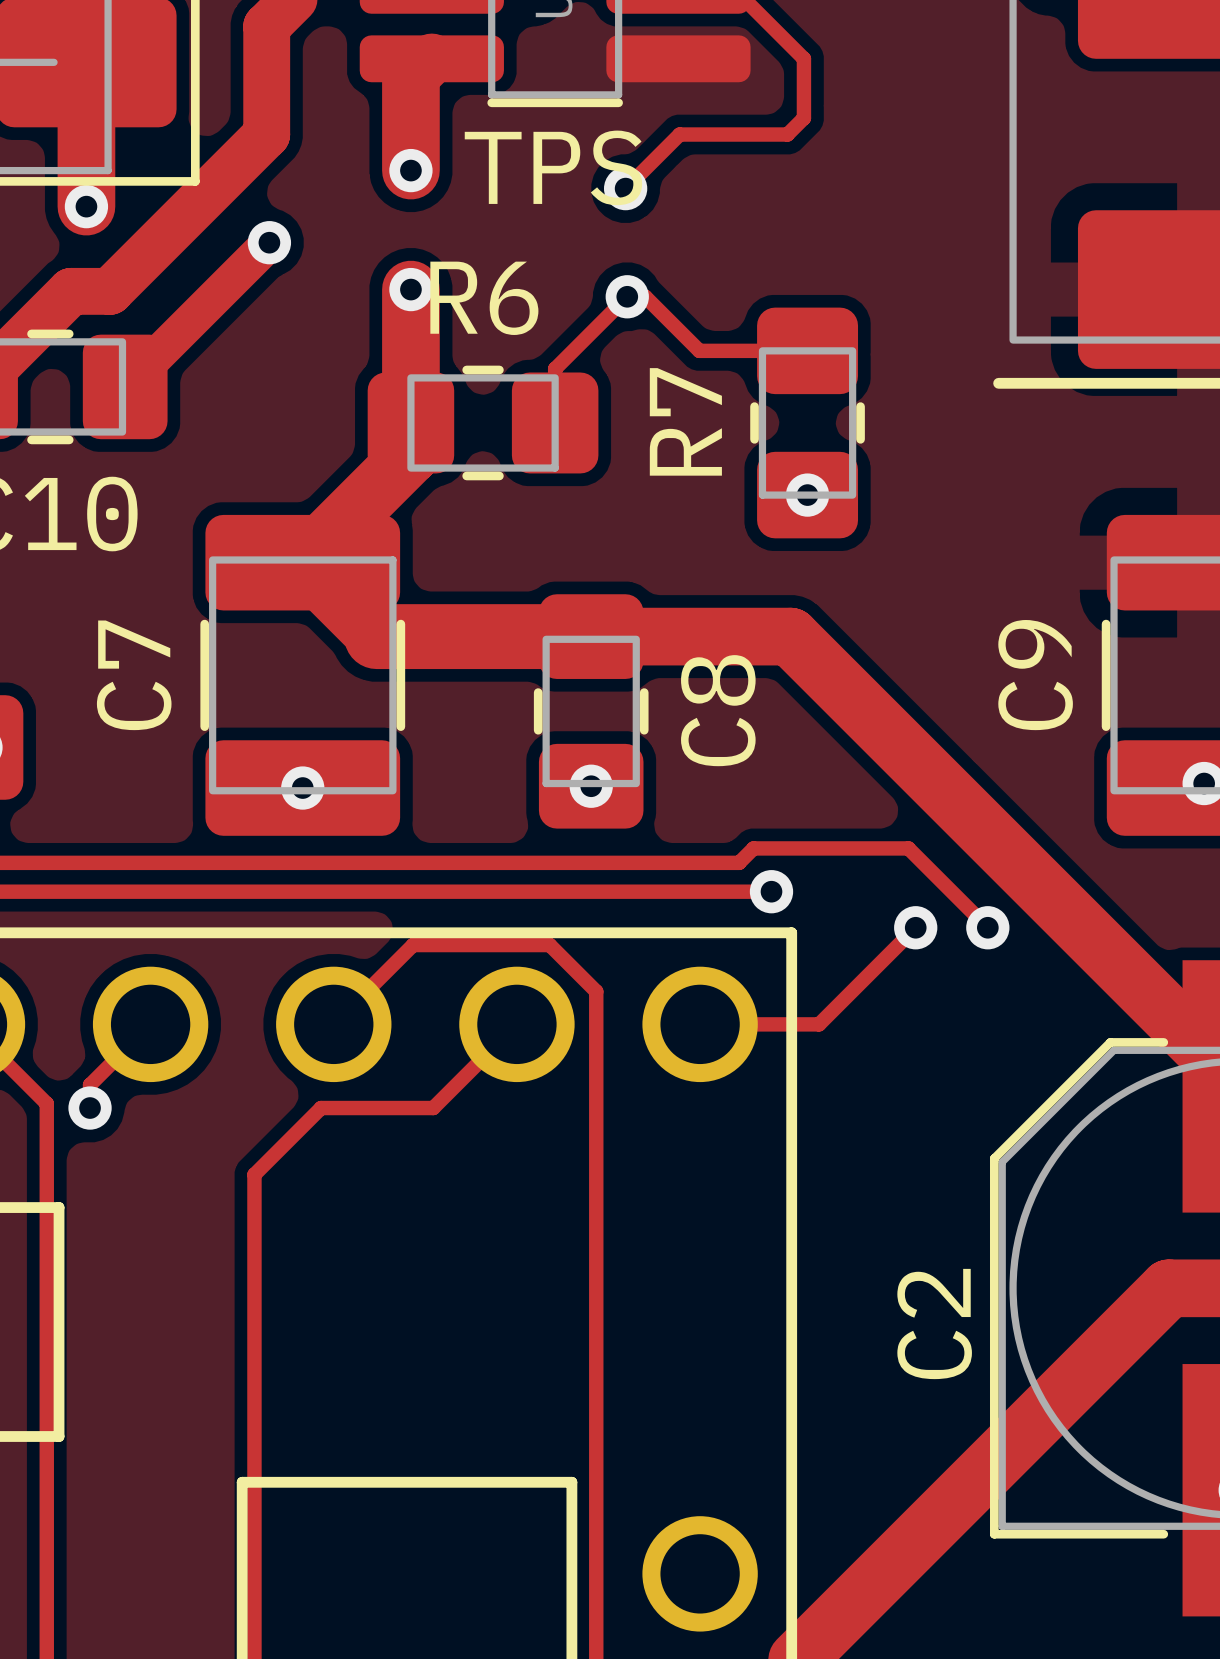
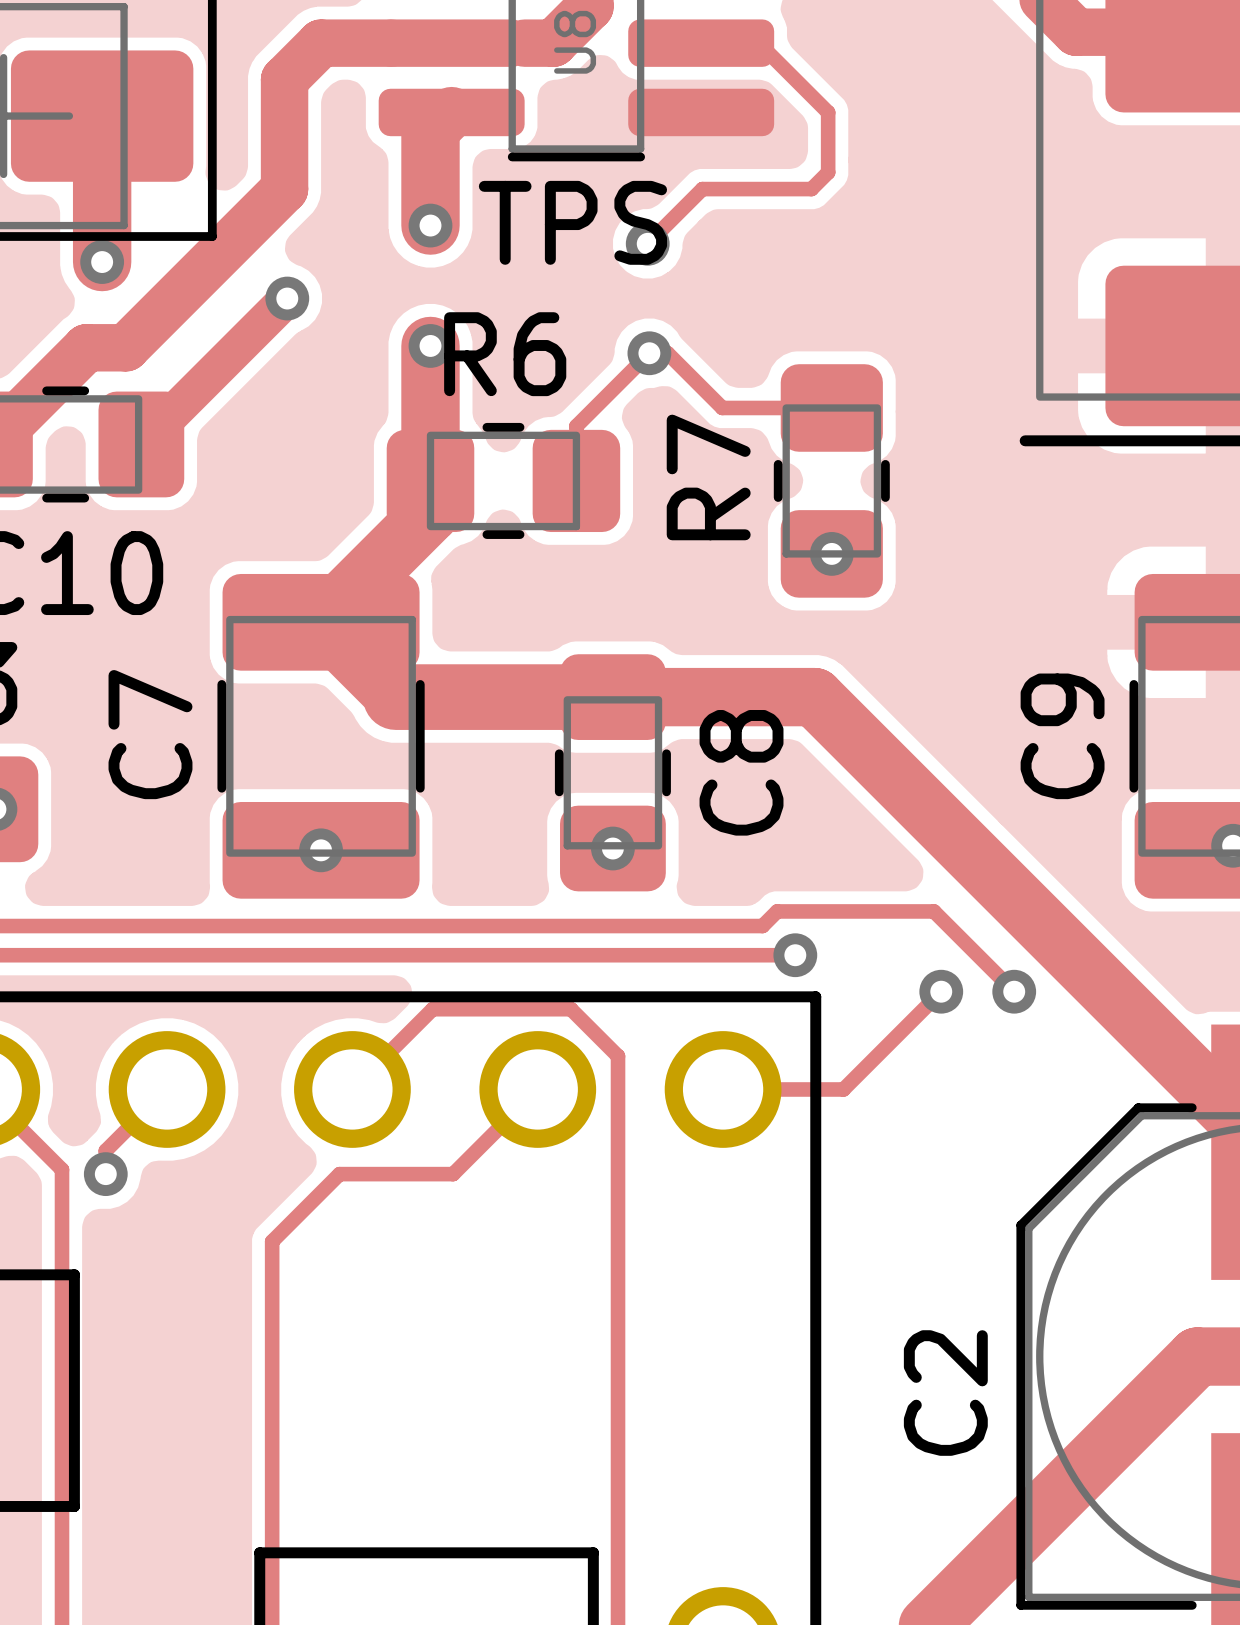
C2 name position: C2 (934, 1324) -> C2 (945, 1393)

